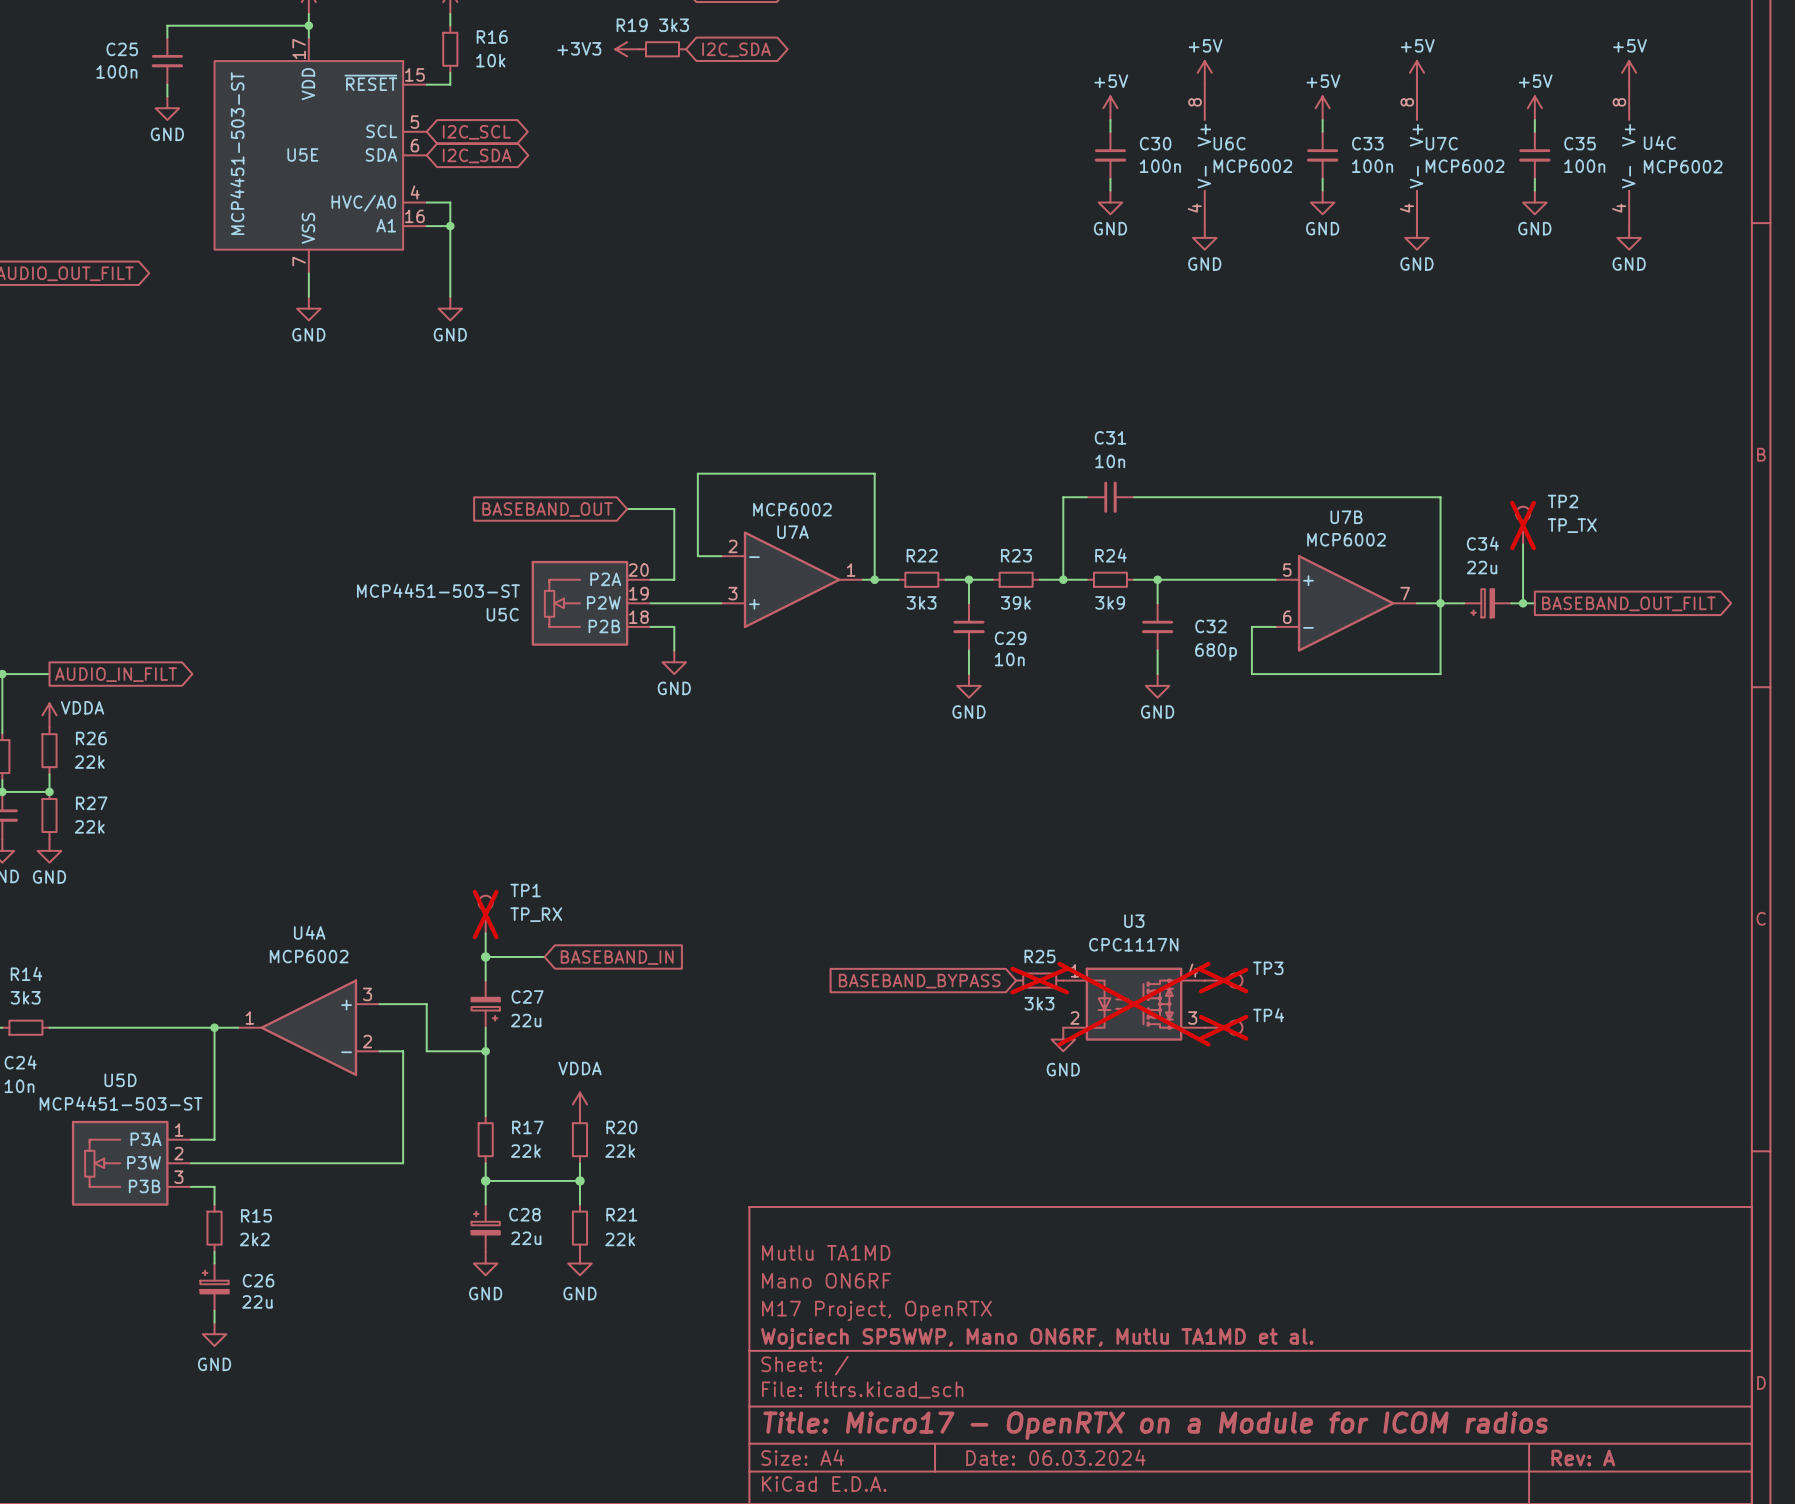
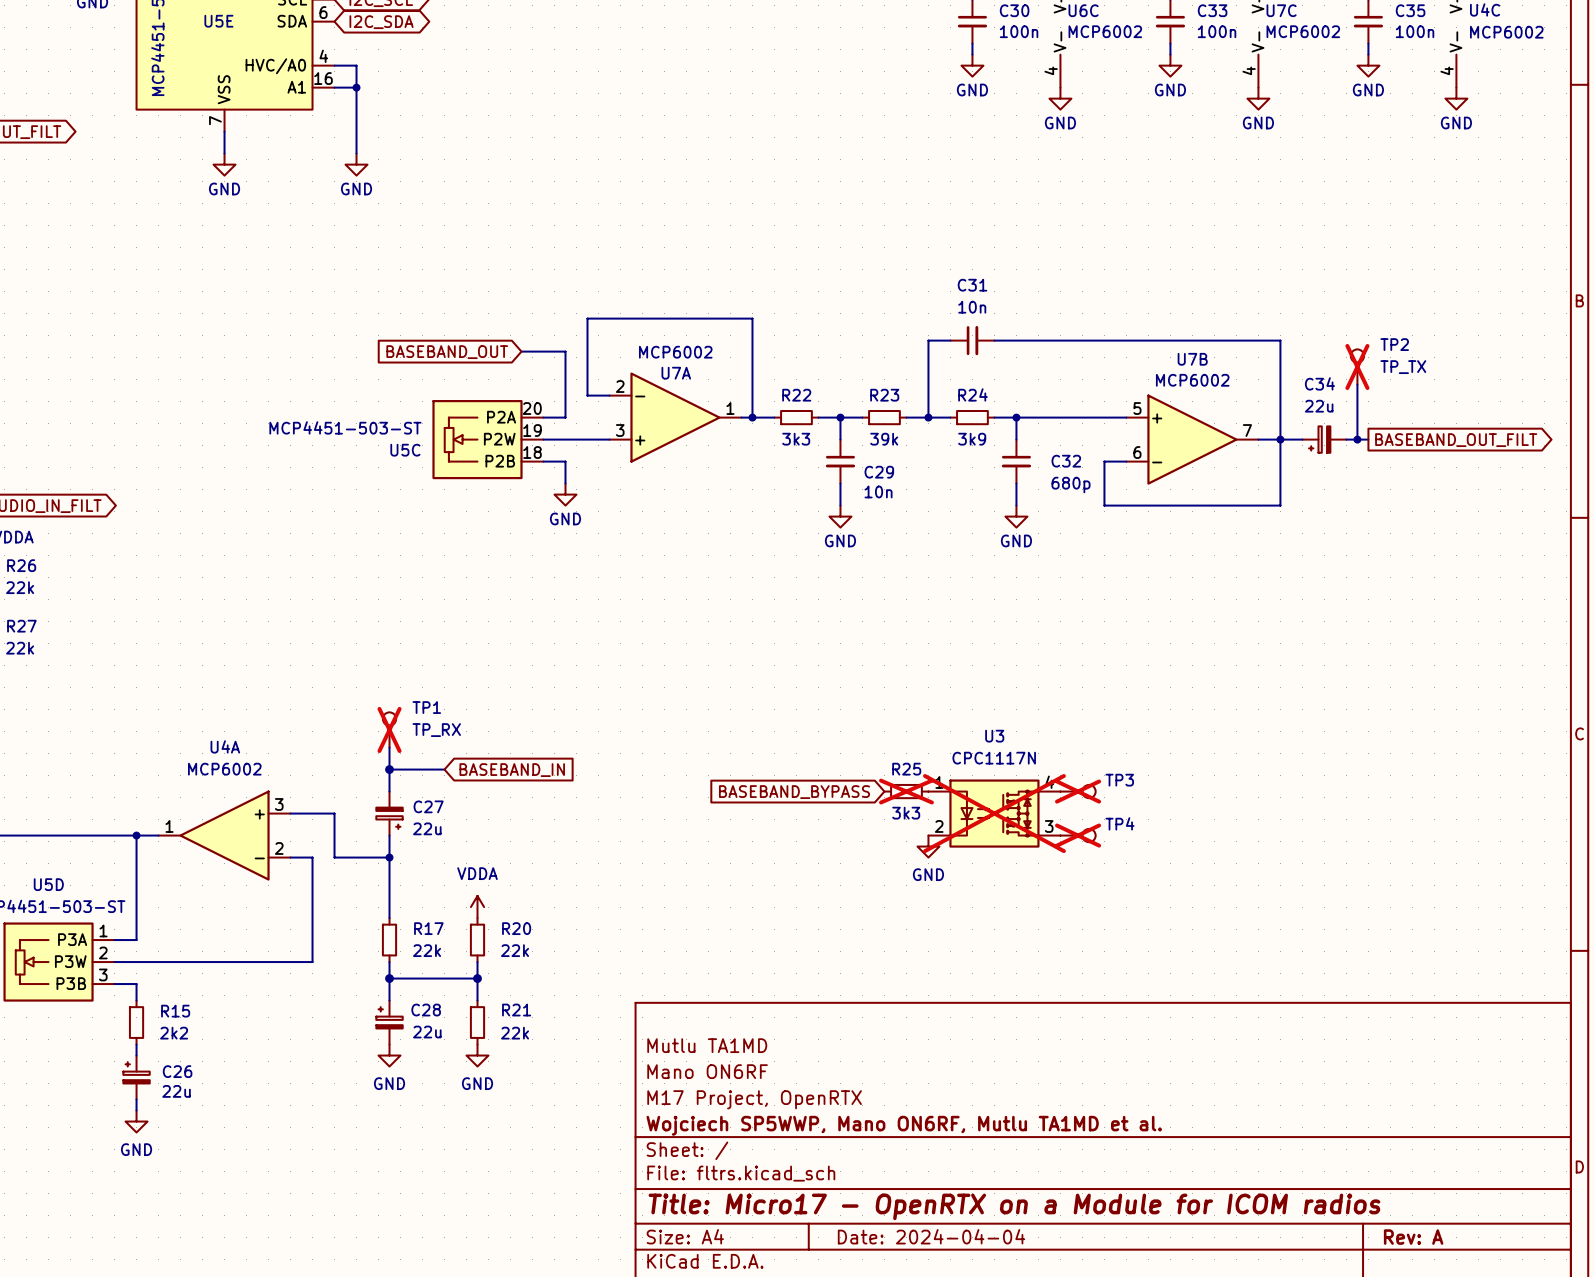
title block: Date: 06.03.2024 (1055, 1457) -> Date: 2024-04-04 (931, 1236)

